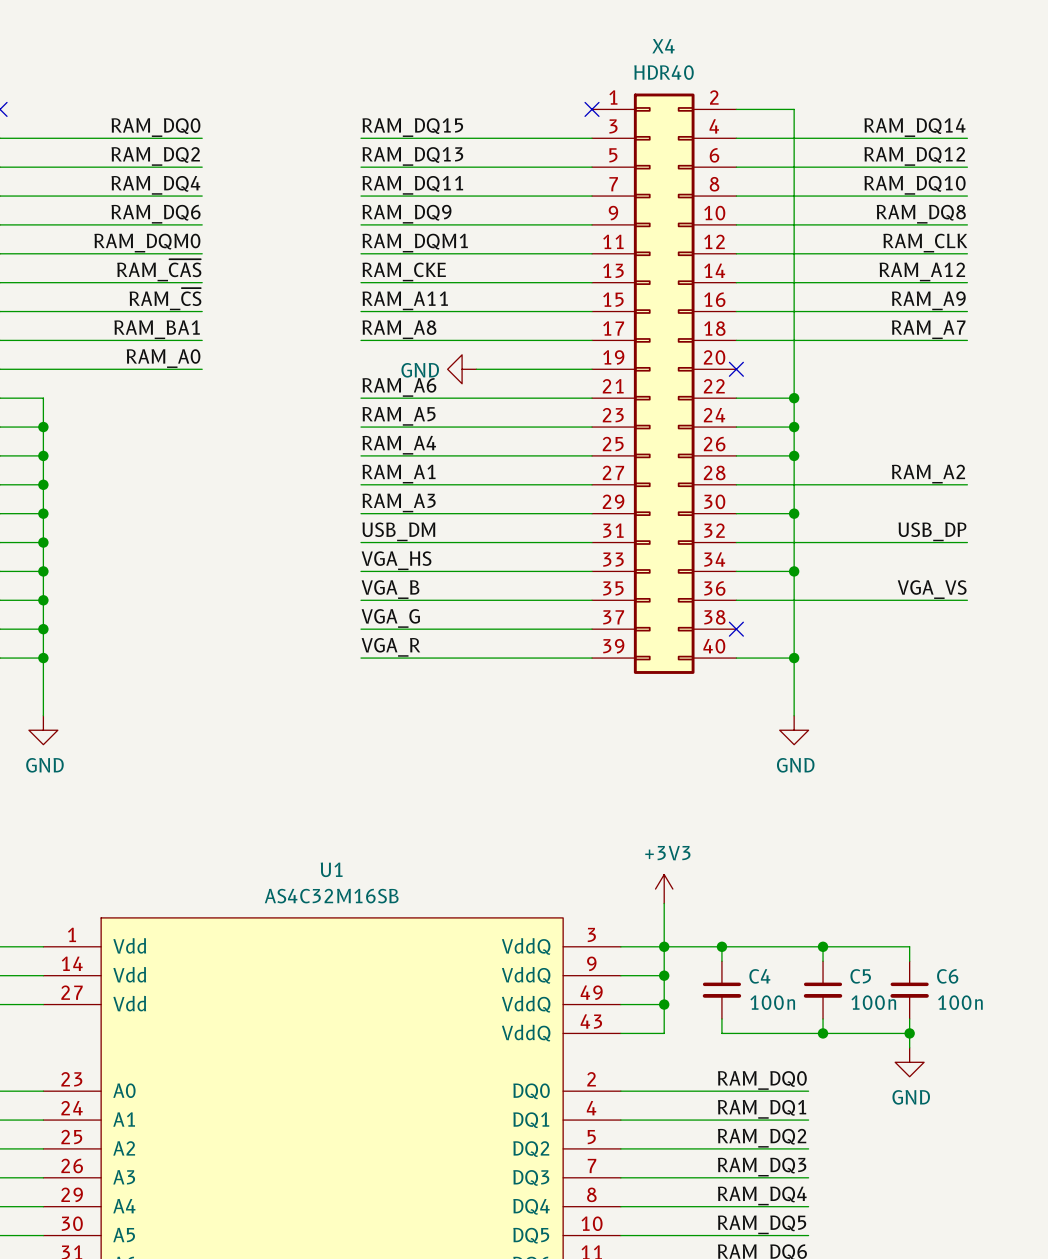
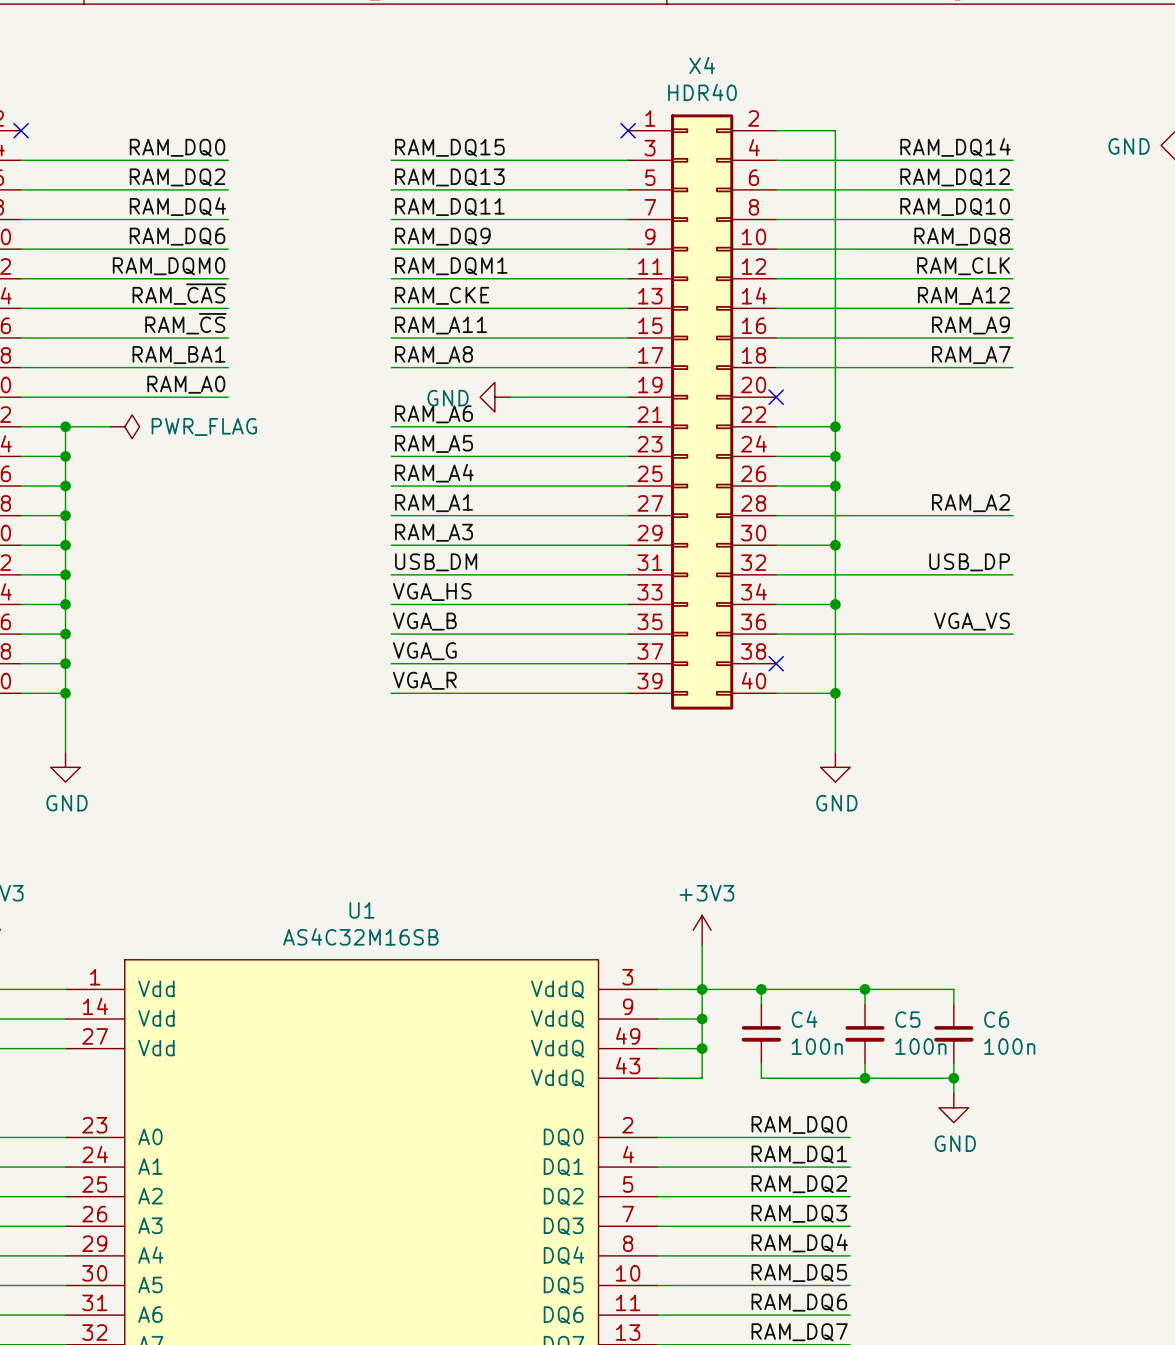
wire: none -> (65, 426) (109, 426)
junction: none -> (65, 426)
power symbol: none -> PWR_FLAG (124, 426)

